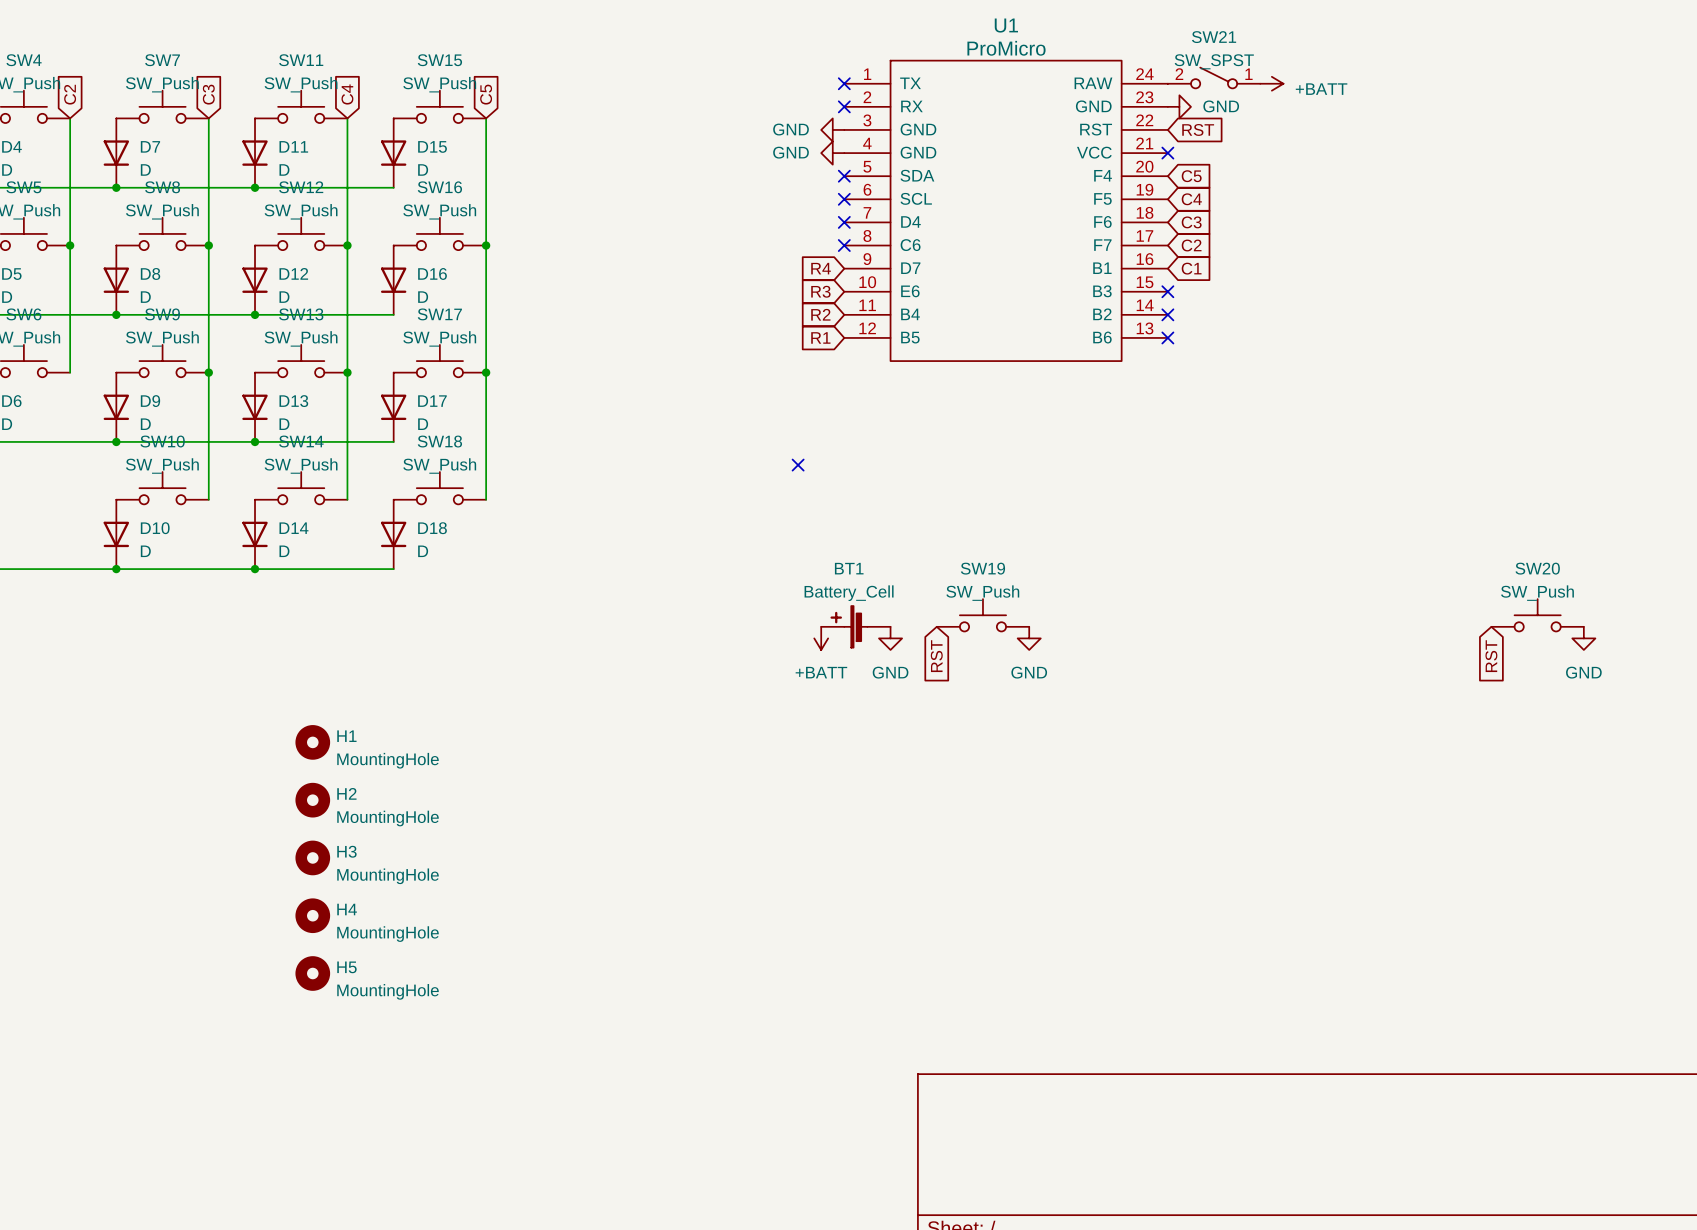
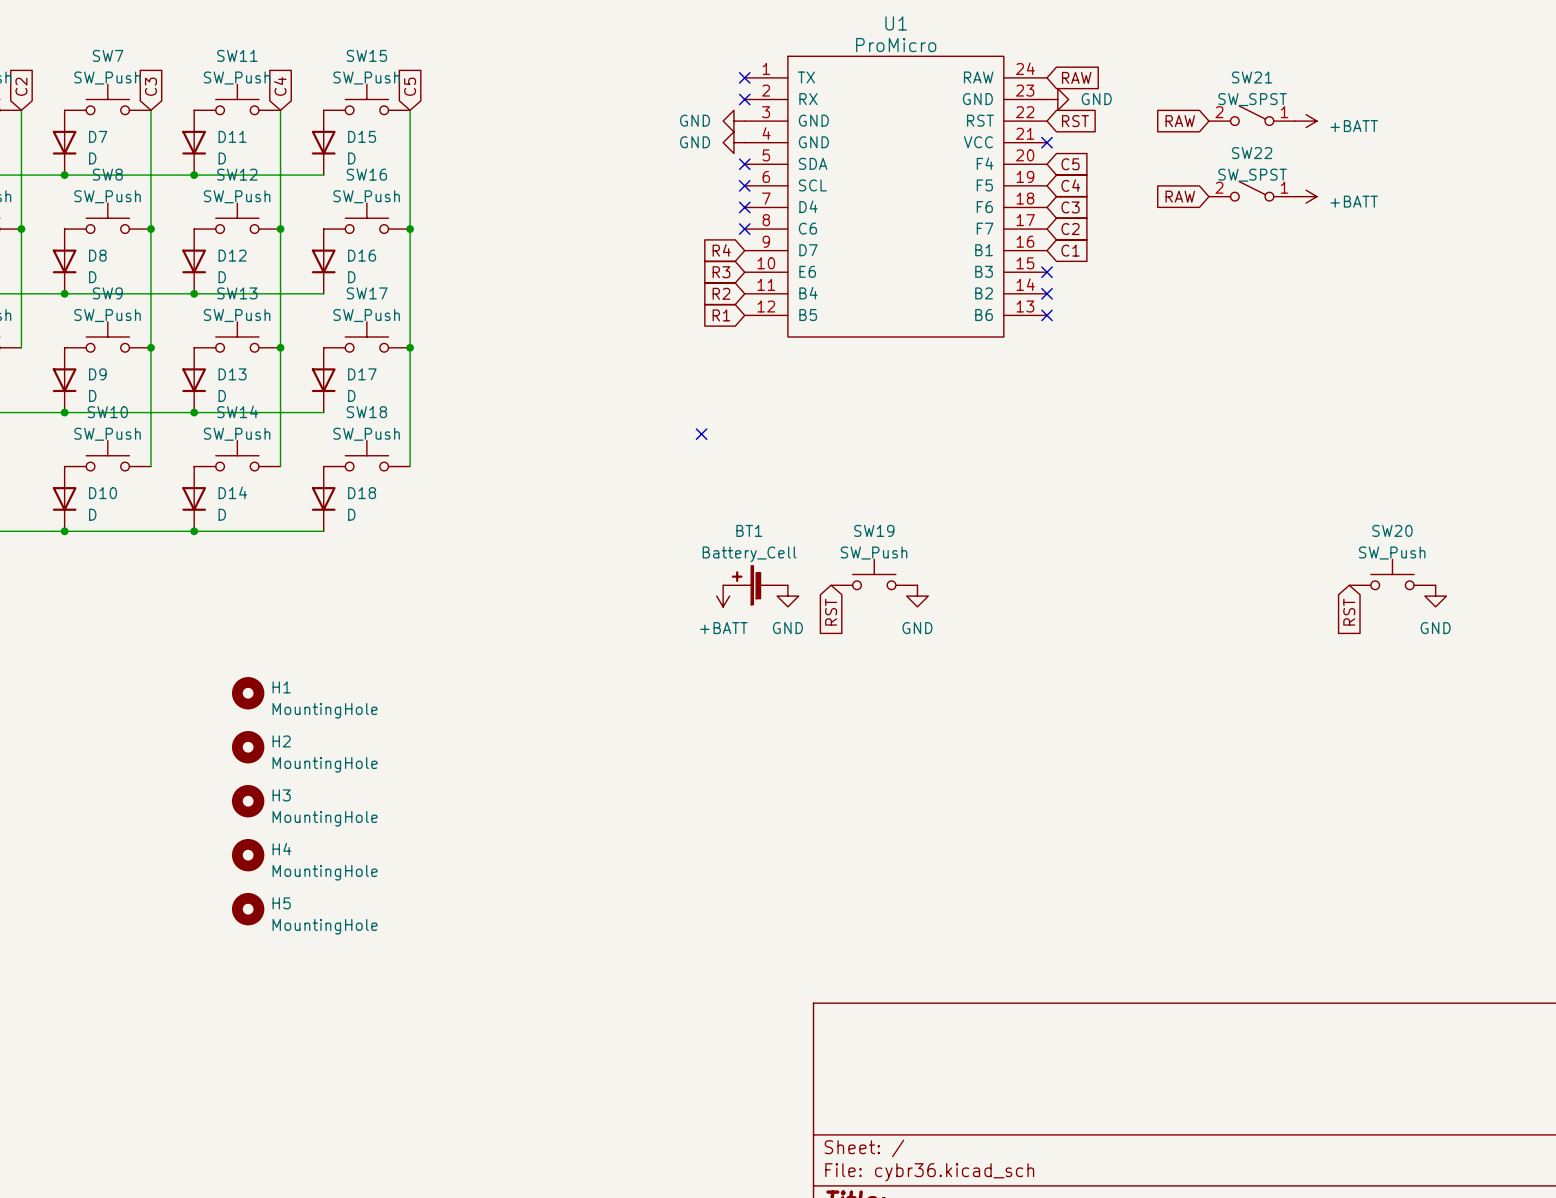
SW21 position: (1214, 77) -> (1252, 115)
global label: none -> RAW (1076, 77)
power symbol: +BATT (1271, 83) -> none
global label: none -> RAW (1180, 121)
power symbol: none -> +BATT (1306, 121)
SW22: none -> SW_SPST (1252, 191)
global label: none -> RAW (1180, 196)
power symbol: none -> +BATT (1306, 196)

